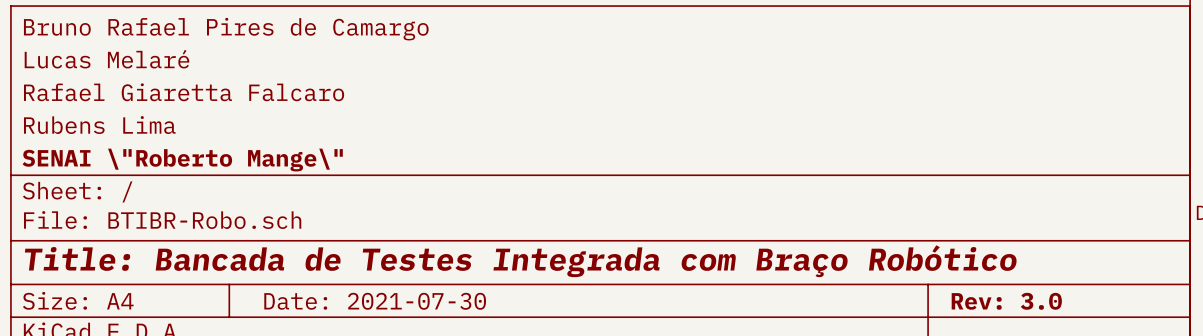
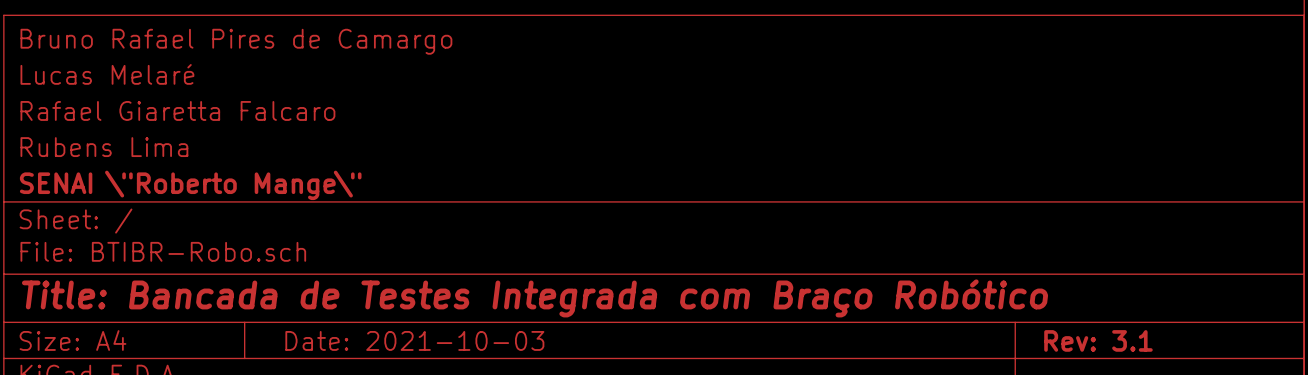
title block: Date: 2021-07-30 (375, 301) -> Date: 2021-10-03 (414, 340)
title block: Rev: 3.0 (1006, 301) -> Rev: 3.1 (1098, 340)

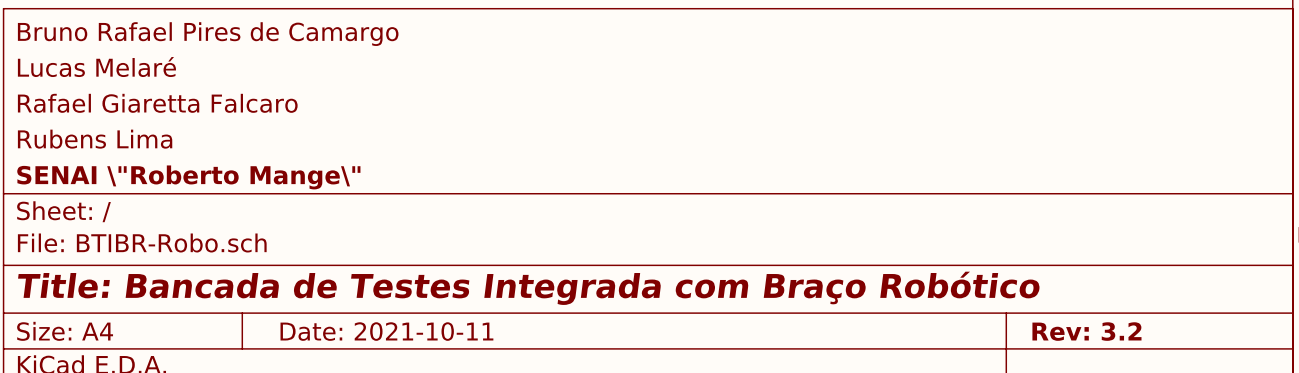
title block: Date: 2021-10-03 (414, 340) -> Date: 2021-10-11 (386, 331)
title block: Rev: 3.1 (1098, 340) -> Rev: 3.2 (1086, 331)

